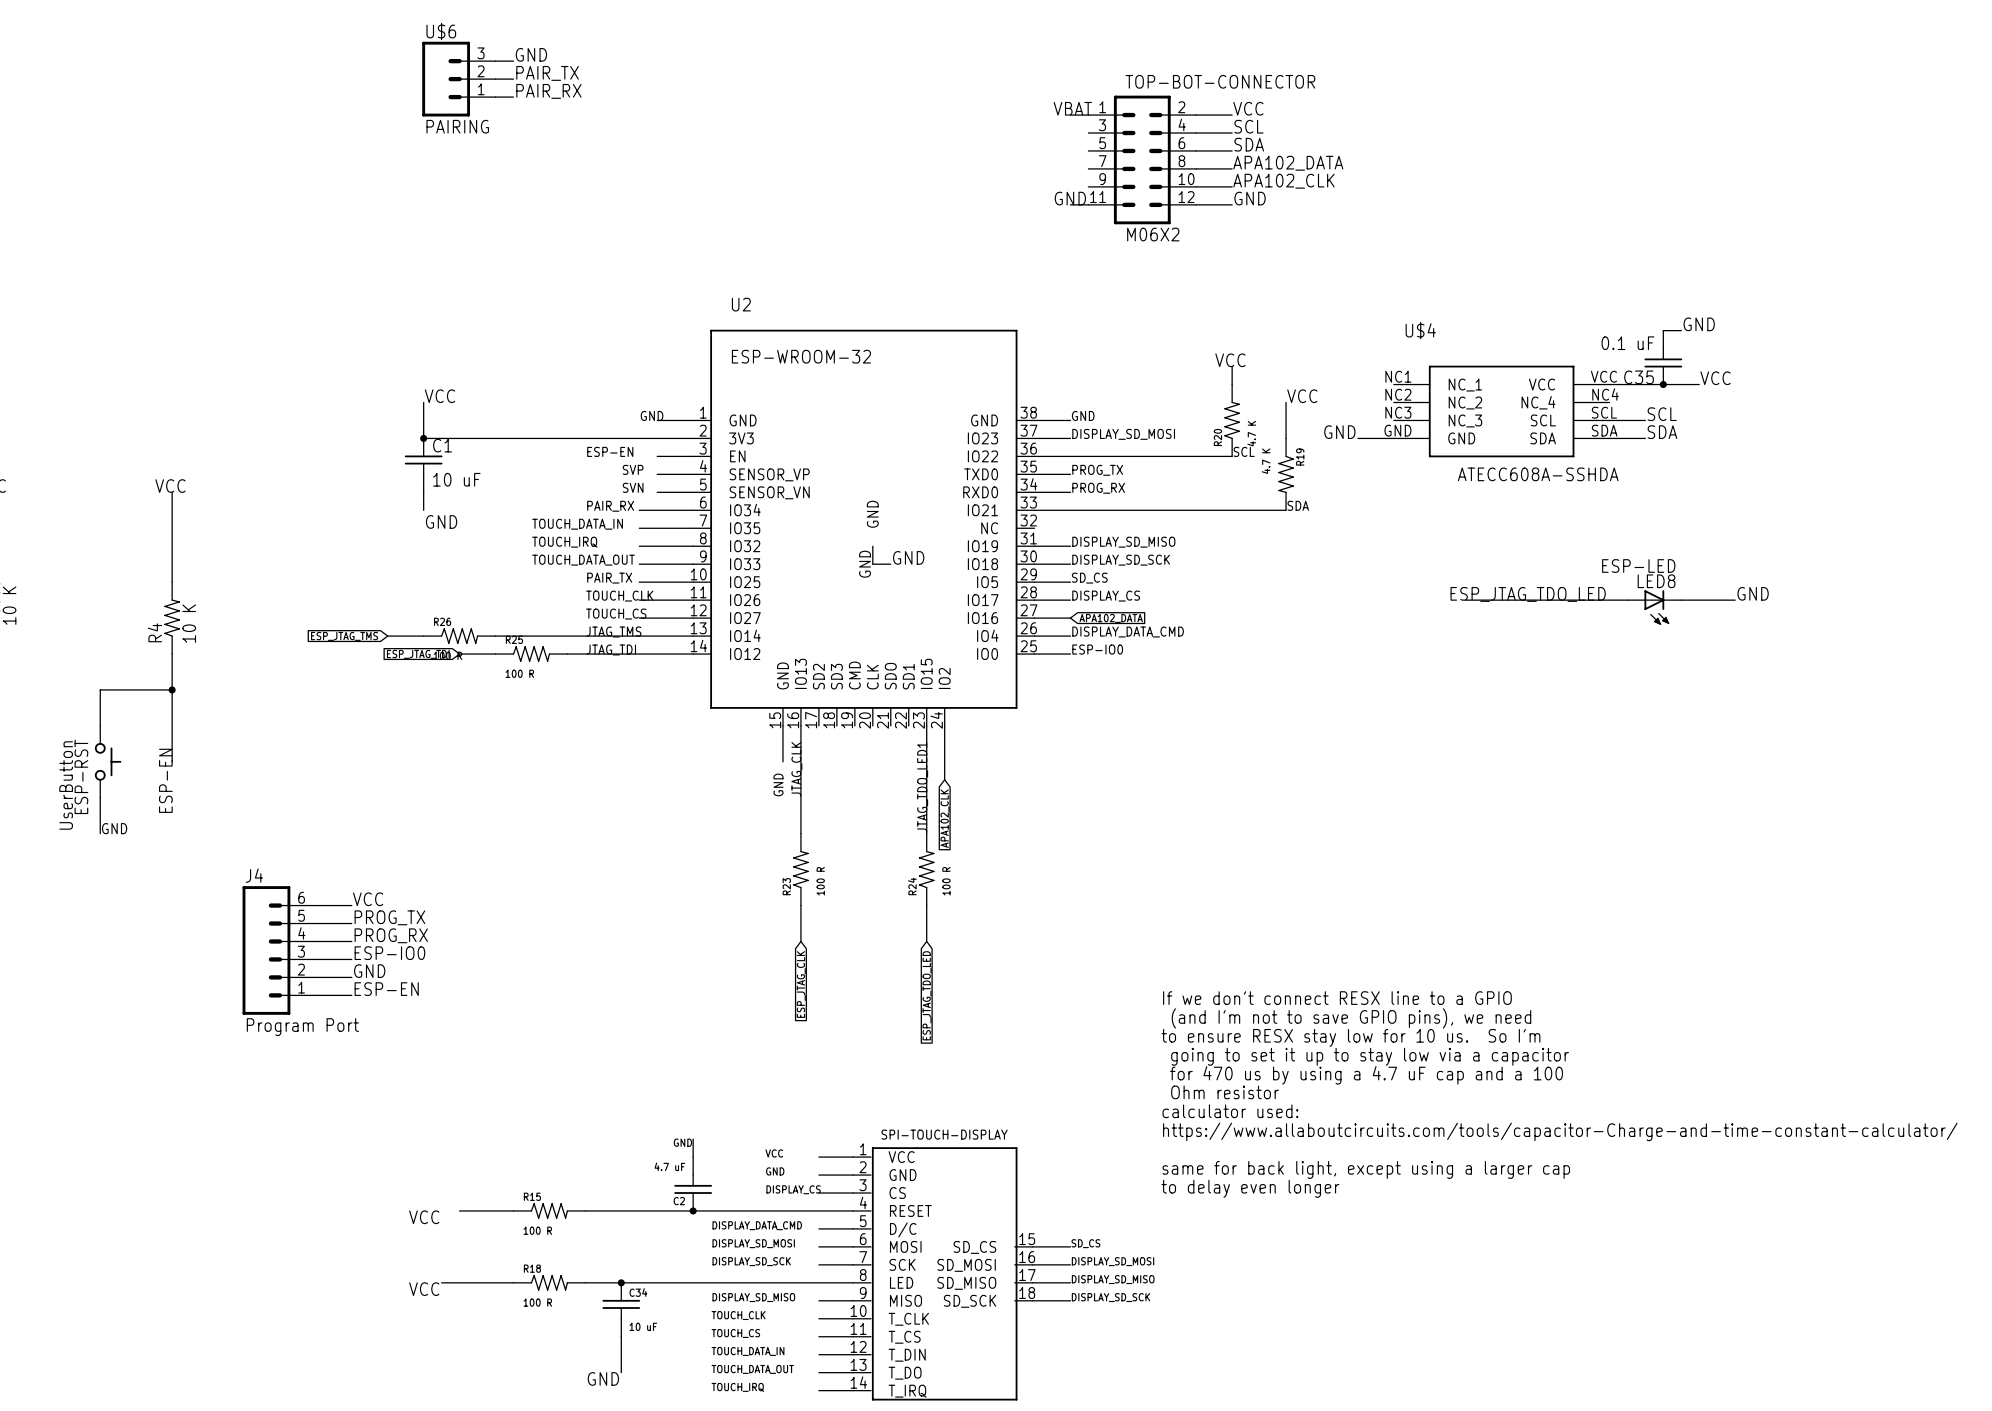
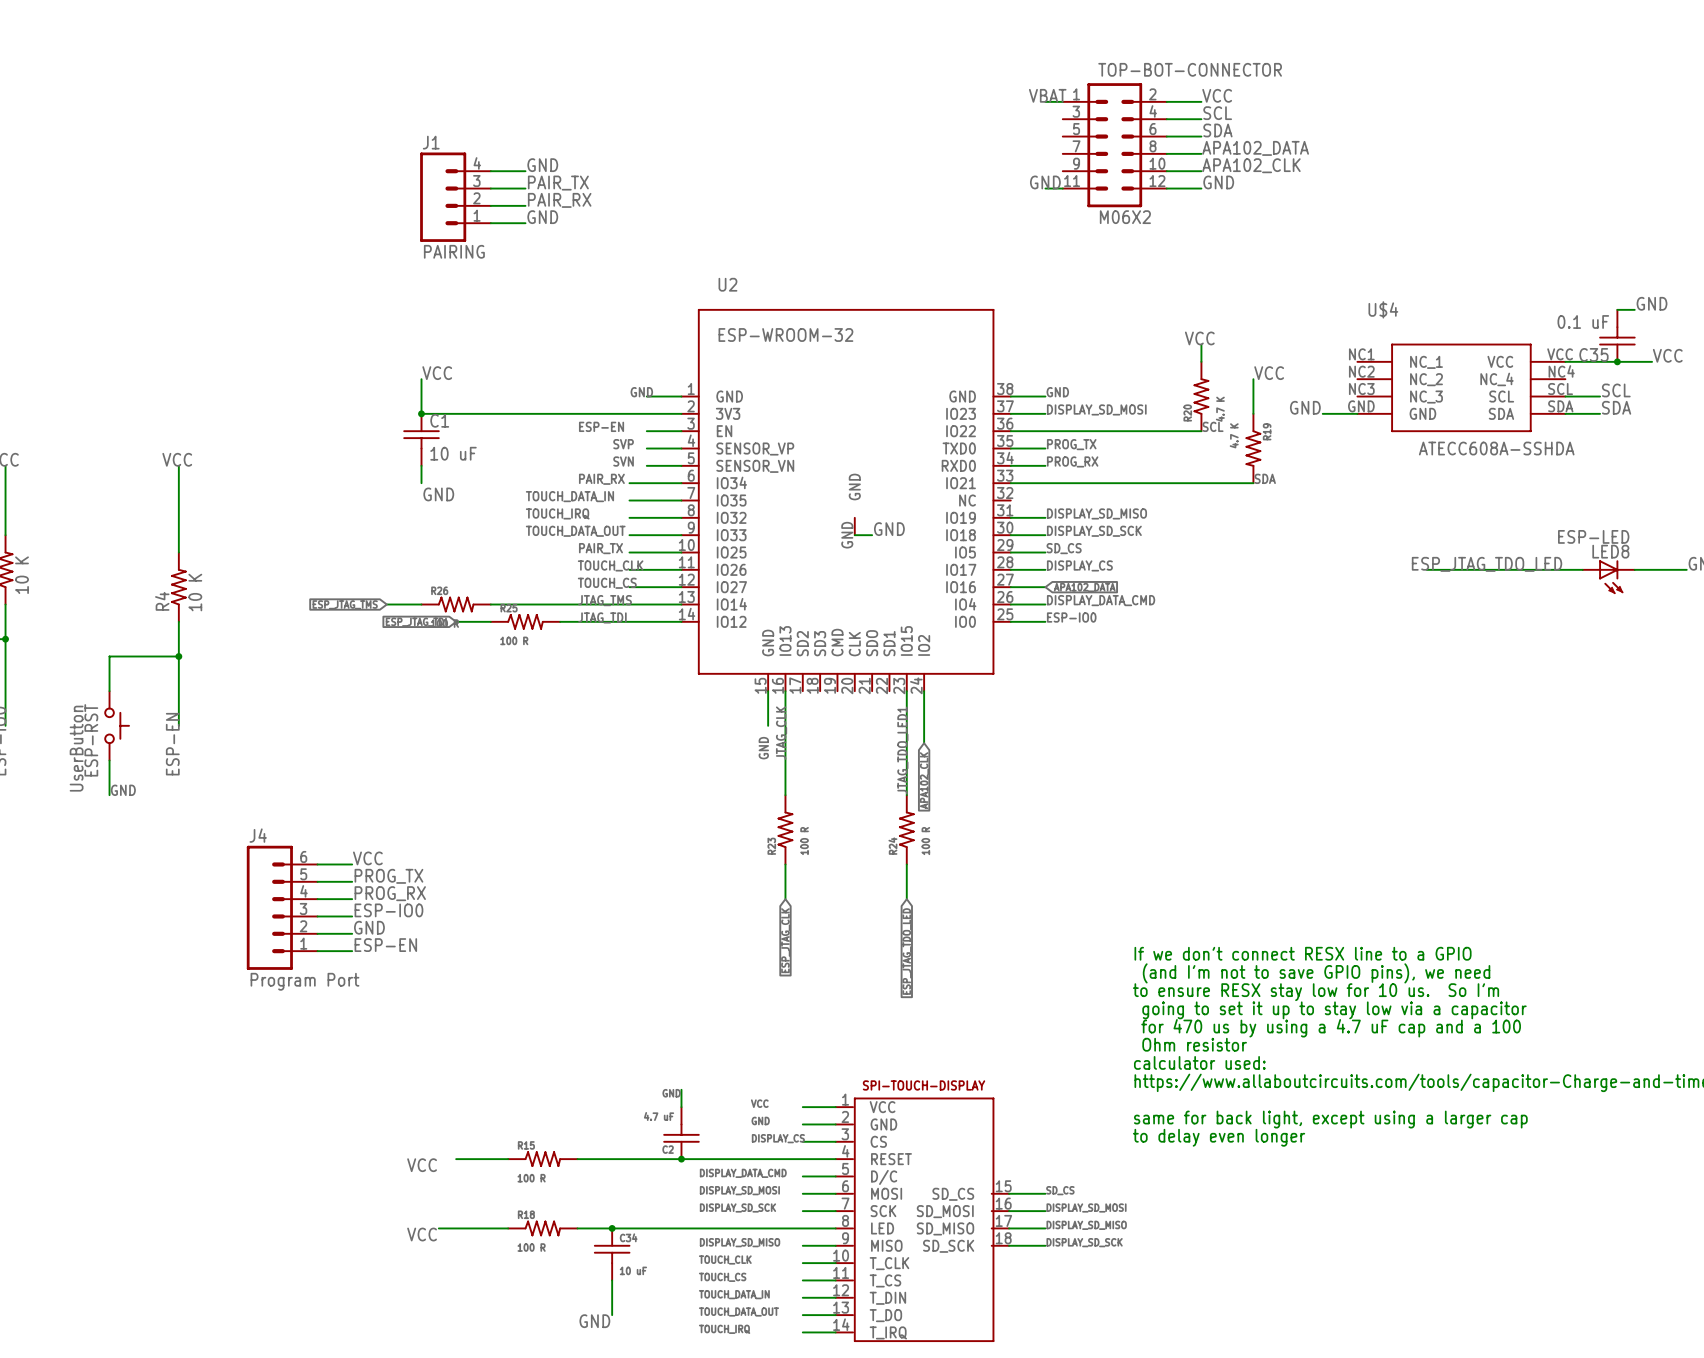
label: GND (531, 54) -> none
wire: (495, 61) (513, 61) -> none
label position: PAIR_TX (547, 73) -> PAIR_TX (558, 183)
U$6: PAIRING (458, 79) -> none
wire: (495, 79) (513, 79) -> none
label position: PAIR_RX (548, 91) -> PAIR_RX (559, 200)
wire: (495, 97) (513, 97) -> none
label: none -> GND (542, 165)
wire: none -> (490, 171) (525, 171)
wire: none -> (490, 188) (525, 188)
J1: none -> PAIRING (455, 197)
wire: none -> (490, 205) (525, 205)
label: none -> GND (542, 217)
wire: none -> (490, 223) (525, 223)

